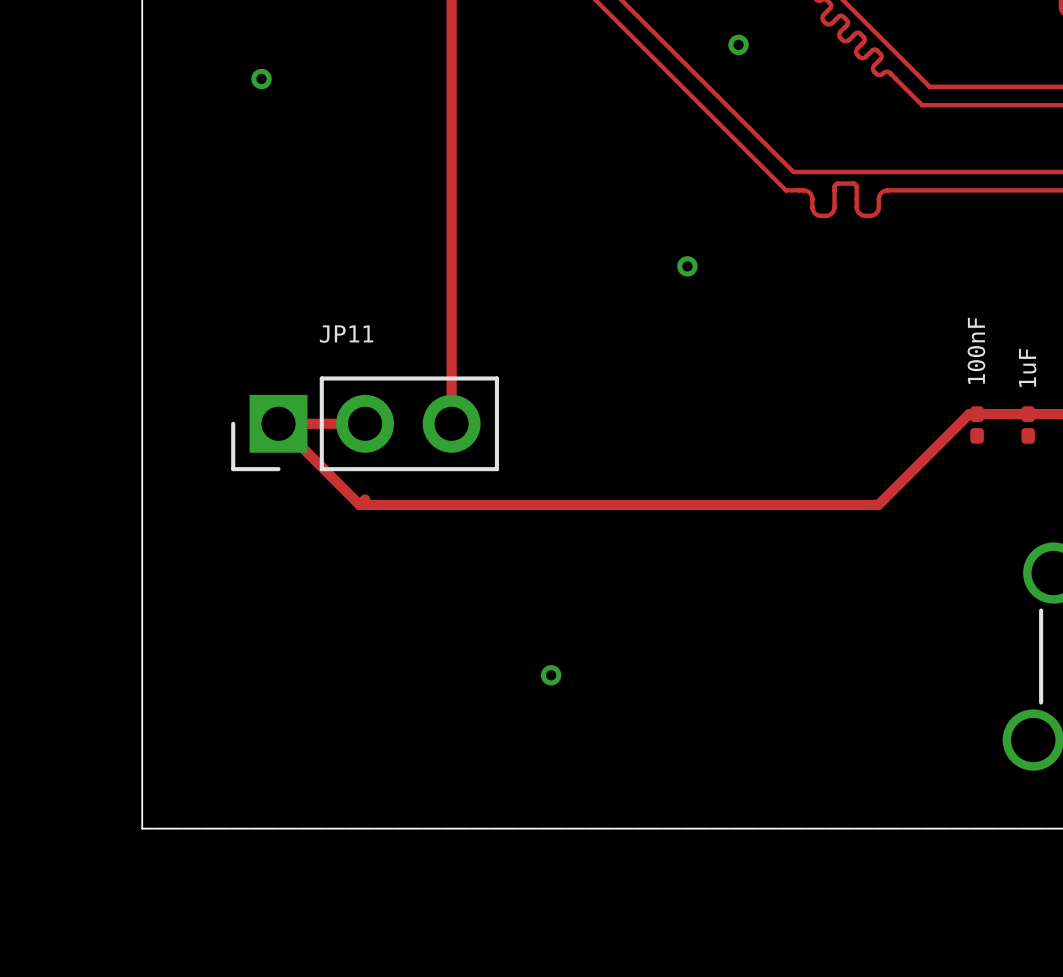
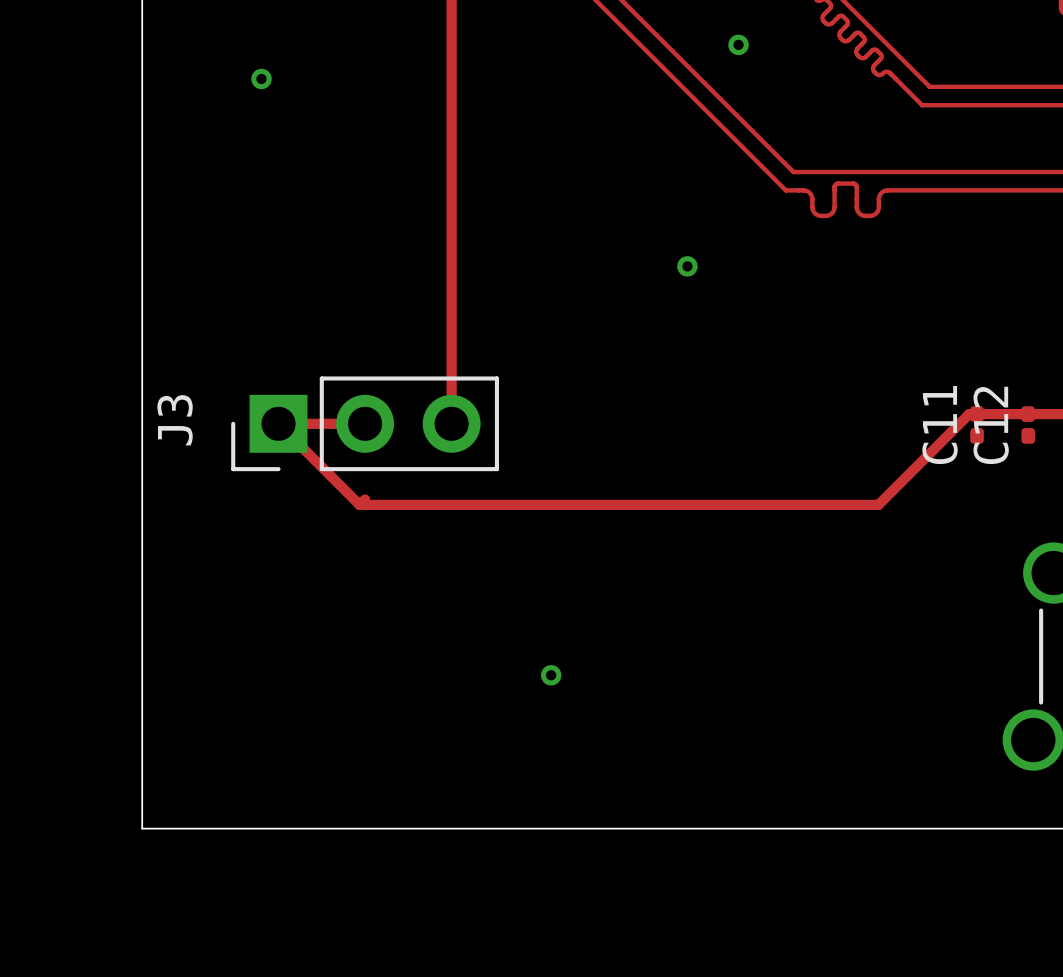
JP11 name: JP11 (346, 334) -> J3 (175, 420)
C11 value: 100nF (976, 350) -> none
C12 value: 1uF (1027, 367) -> none
C11 name: none -> C11 (940, 425)
C12 name: none -> C12 (991, 425)

